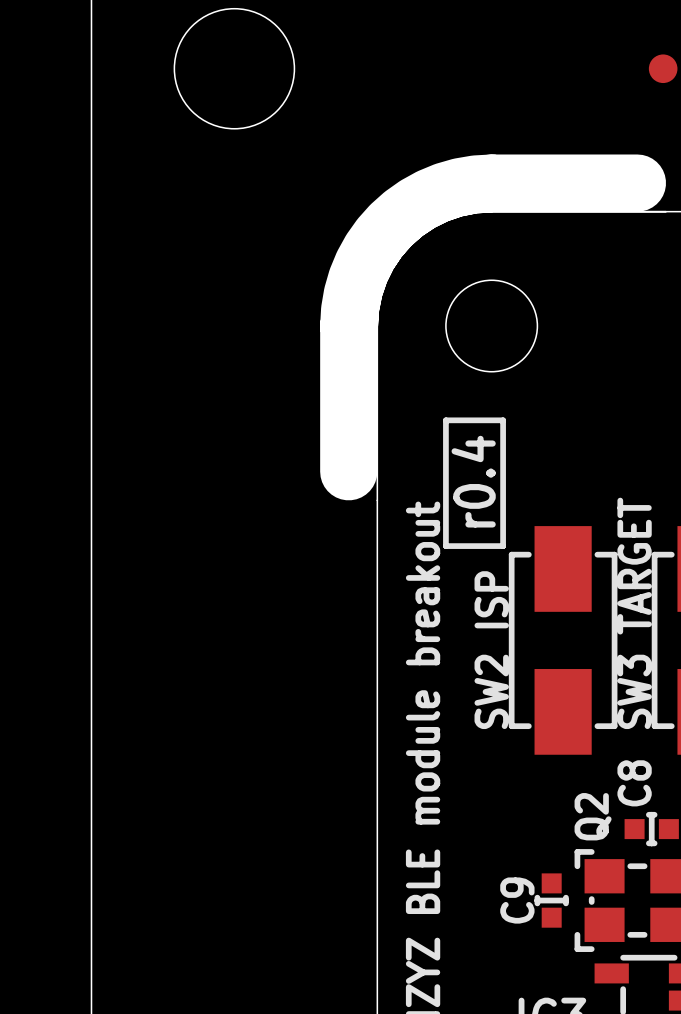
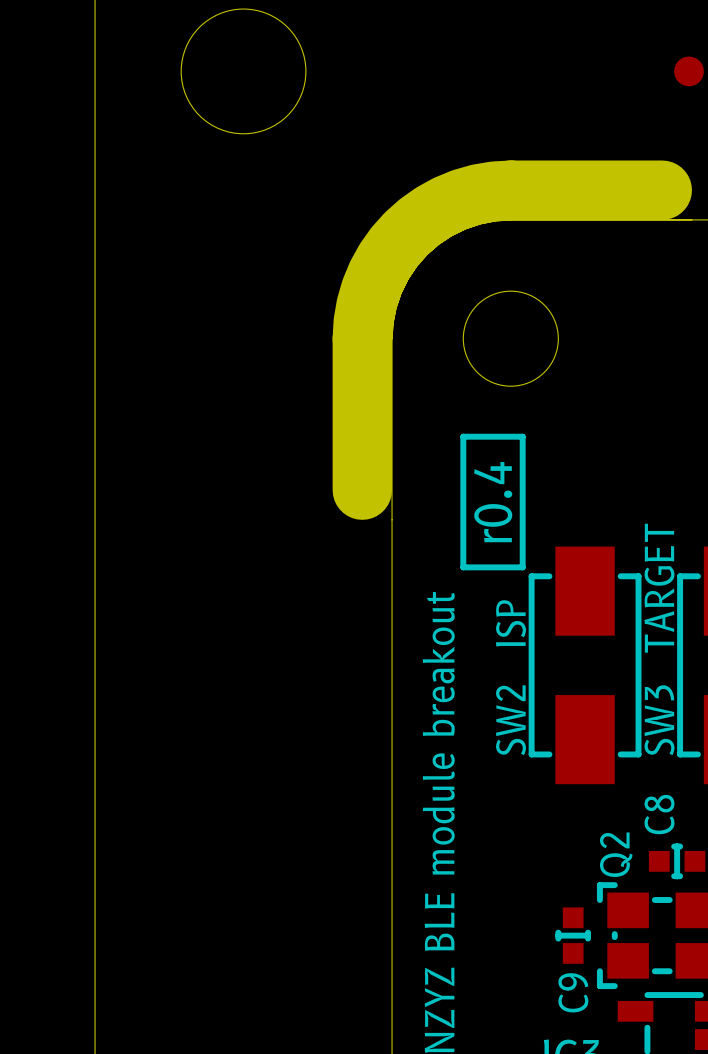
C9 name position: C9 (517, 900) -> C9 (573, 992)

